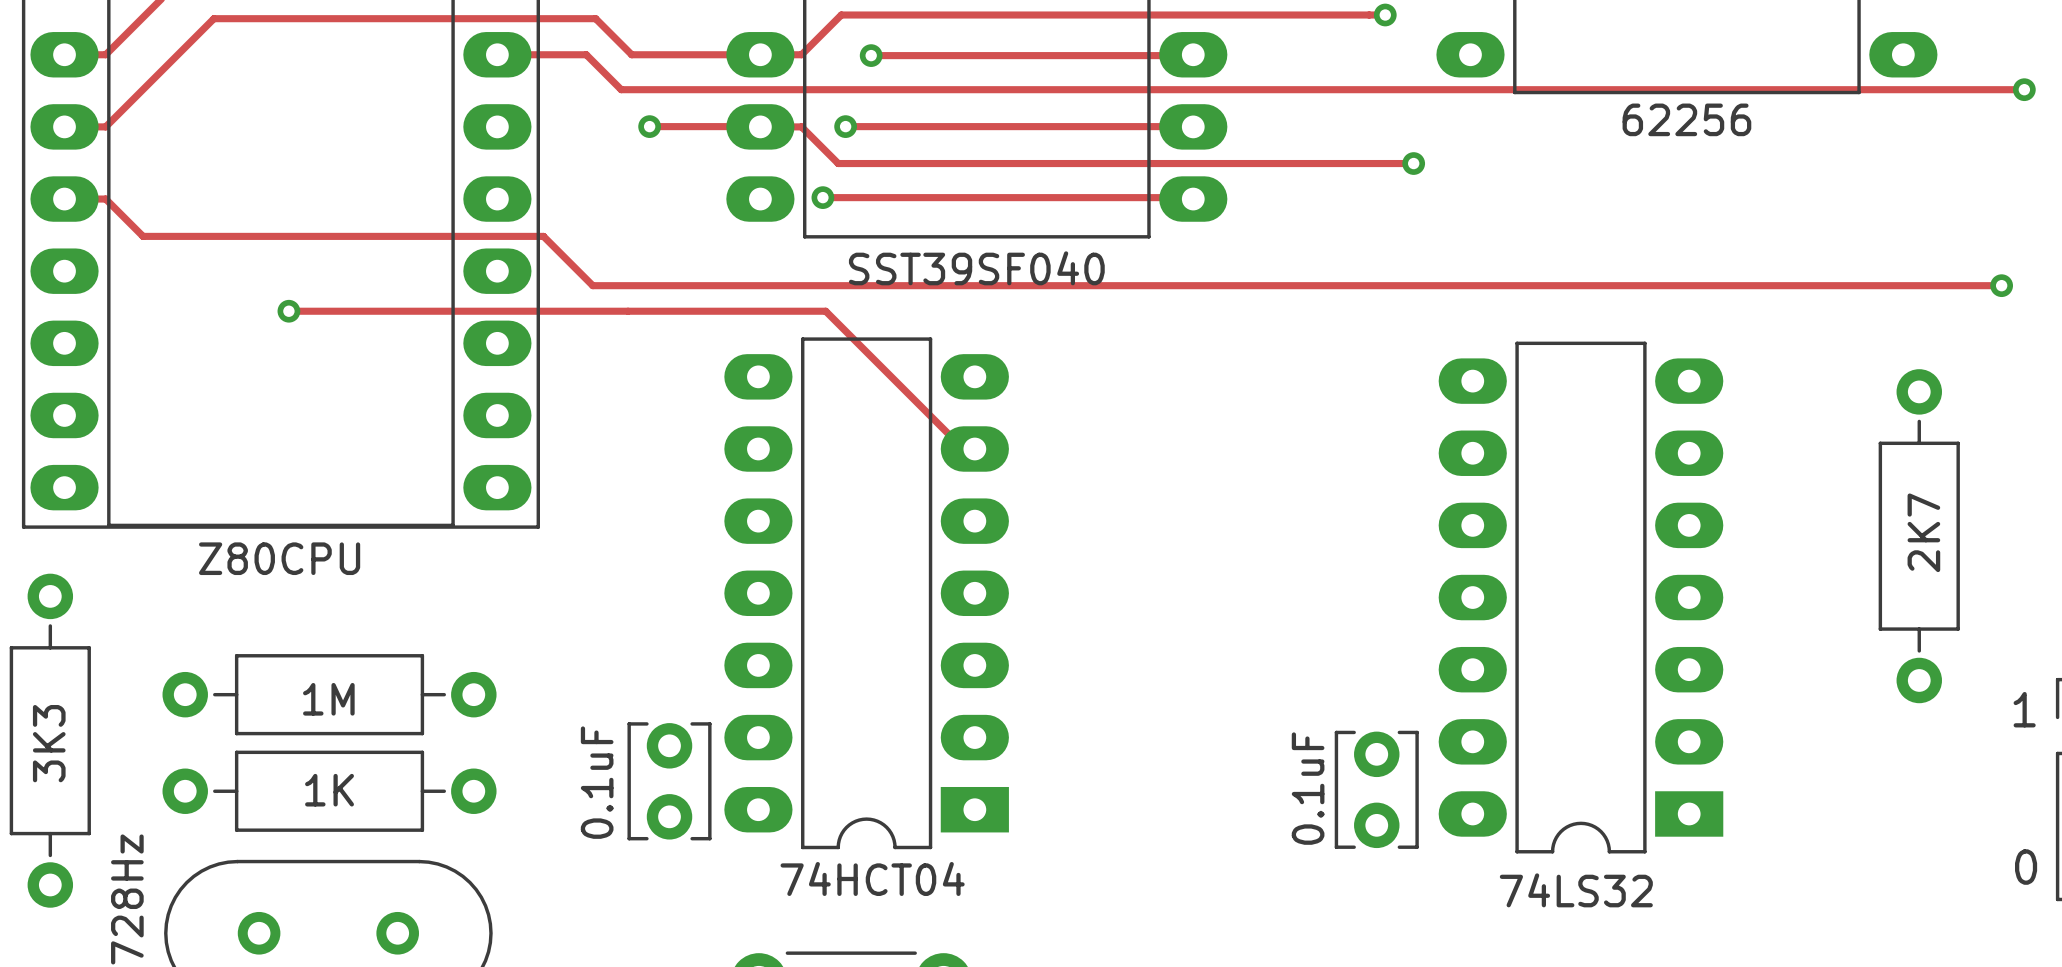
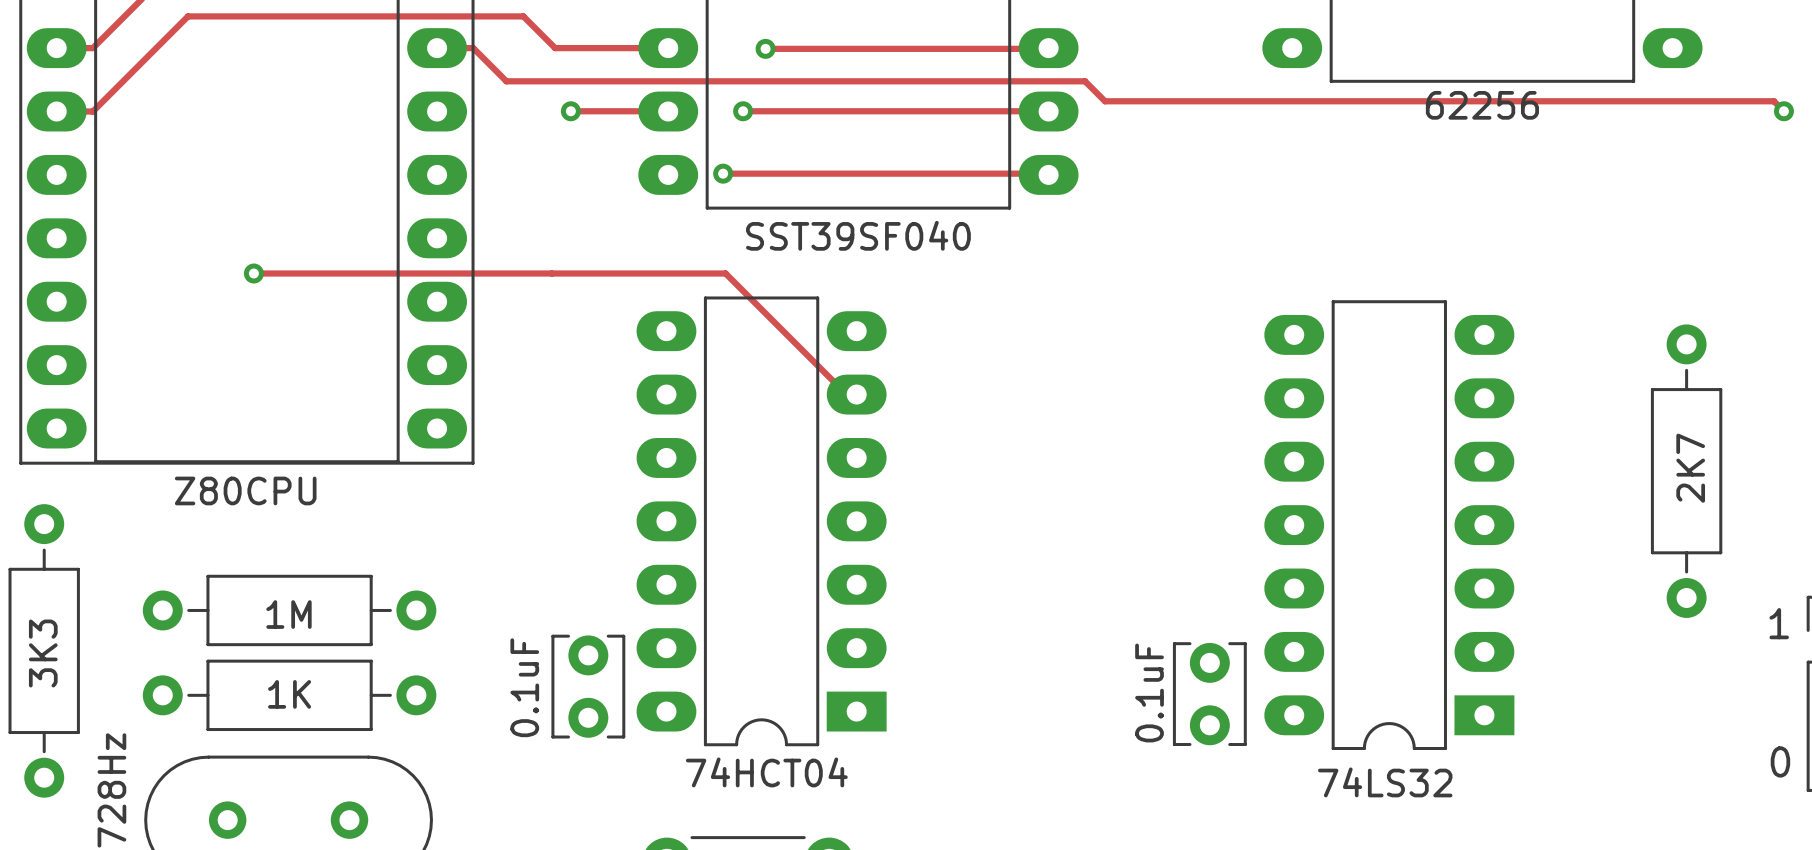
track: (1385, 15) (841, 15) (801, 54) (760, 54) -> none
via: (1385, 15) -> none
track: (538, 54) (586, 54) (621, 89) (2024, 89) -> (473, 48) (506, 81) (1085, 81) (1105, 101) (1773, 101) (1783, 111)
via position: (2024, 89) -> (1783, 111)
track: (760, 126) (801, 126) (838, 163) (1413, 163) -> none
via: (1413, 163) -> none
track: (64, 199) (105, 199) (143, 236) (543, 236) (592, 285) (2001, 285) -> none
via: (2001, 285) -> none

